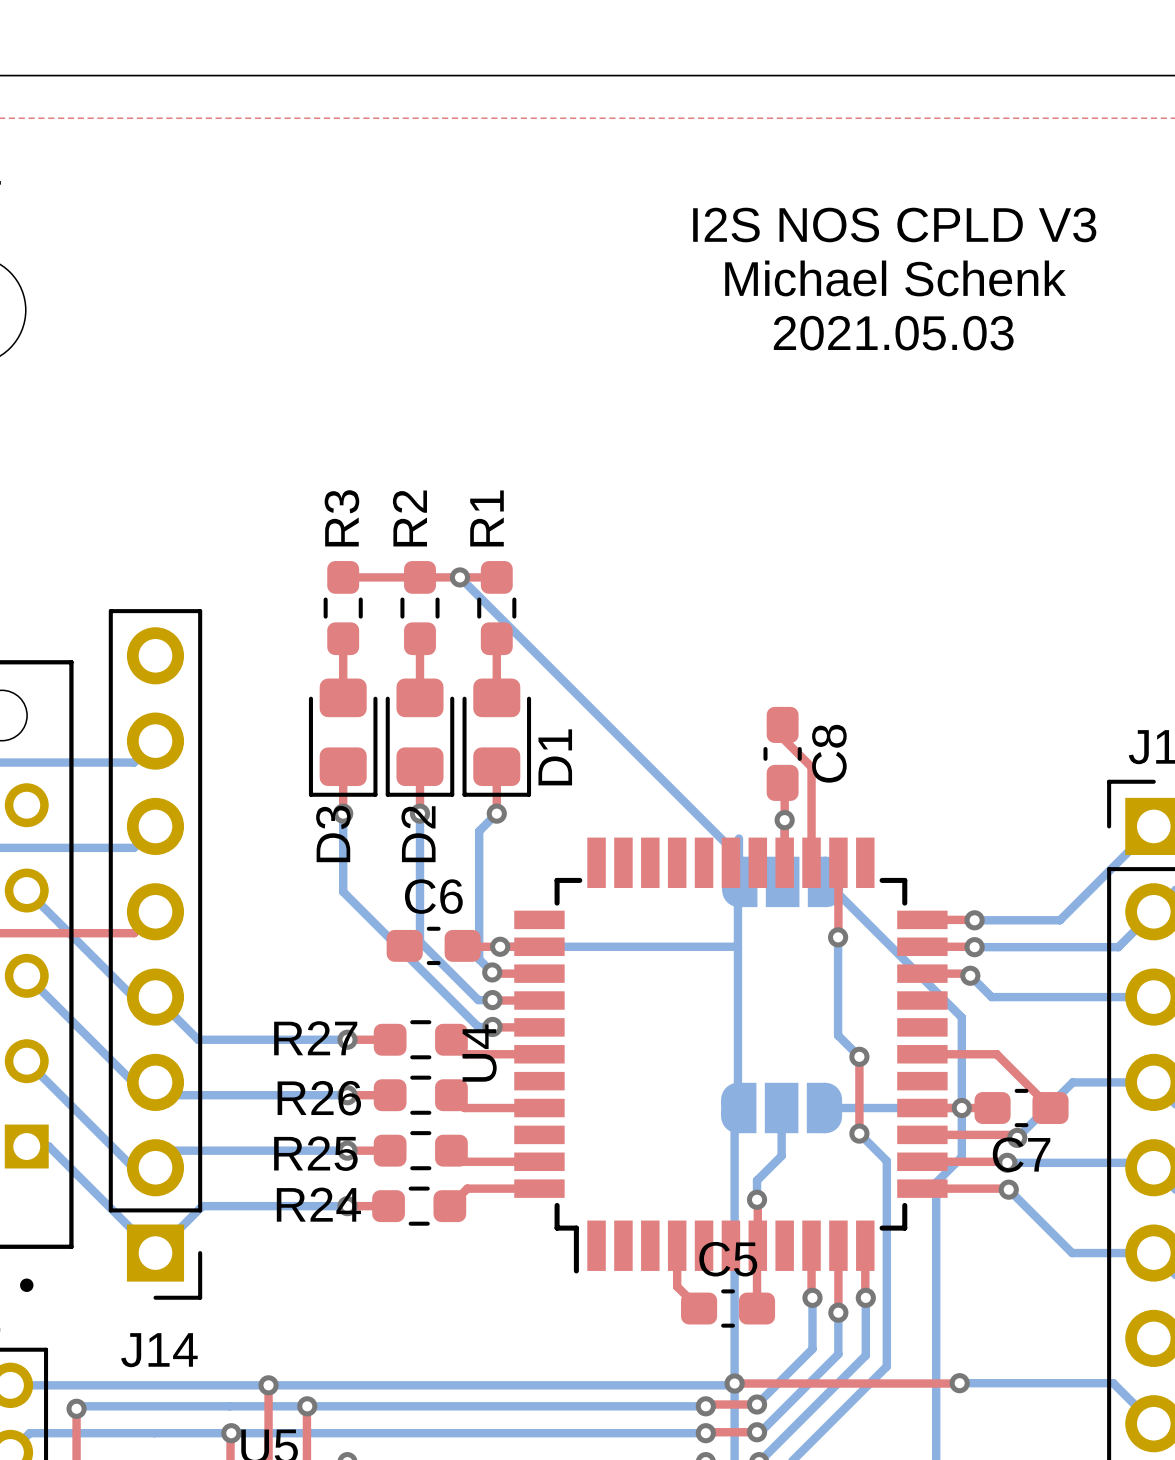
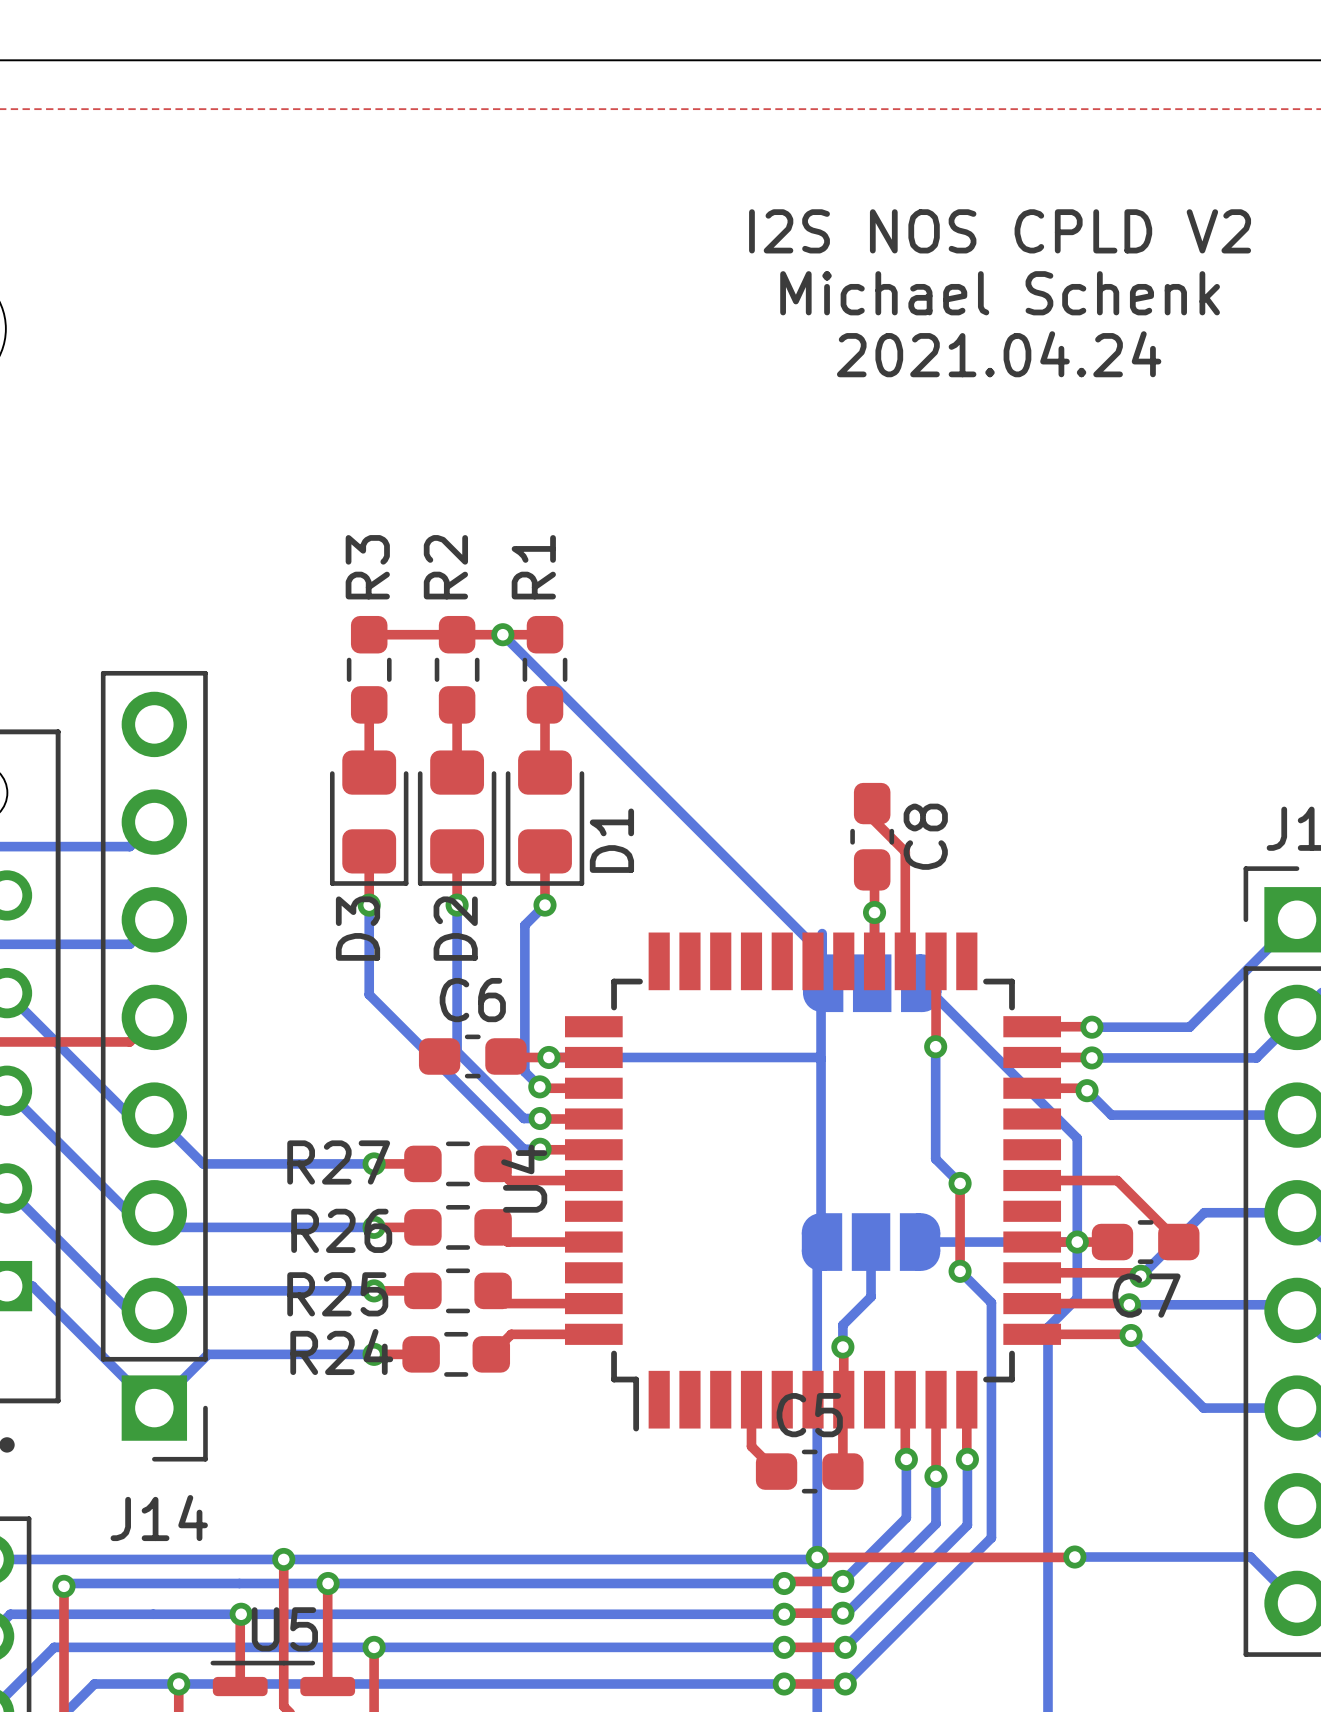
text: I2S NOS CPLD V3 (894, 225) -> I2S NOS CPLD V2 (1000, 231)
text: 2021.05.03 (893, 333) -> 2021.04.24 (999, 354)

